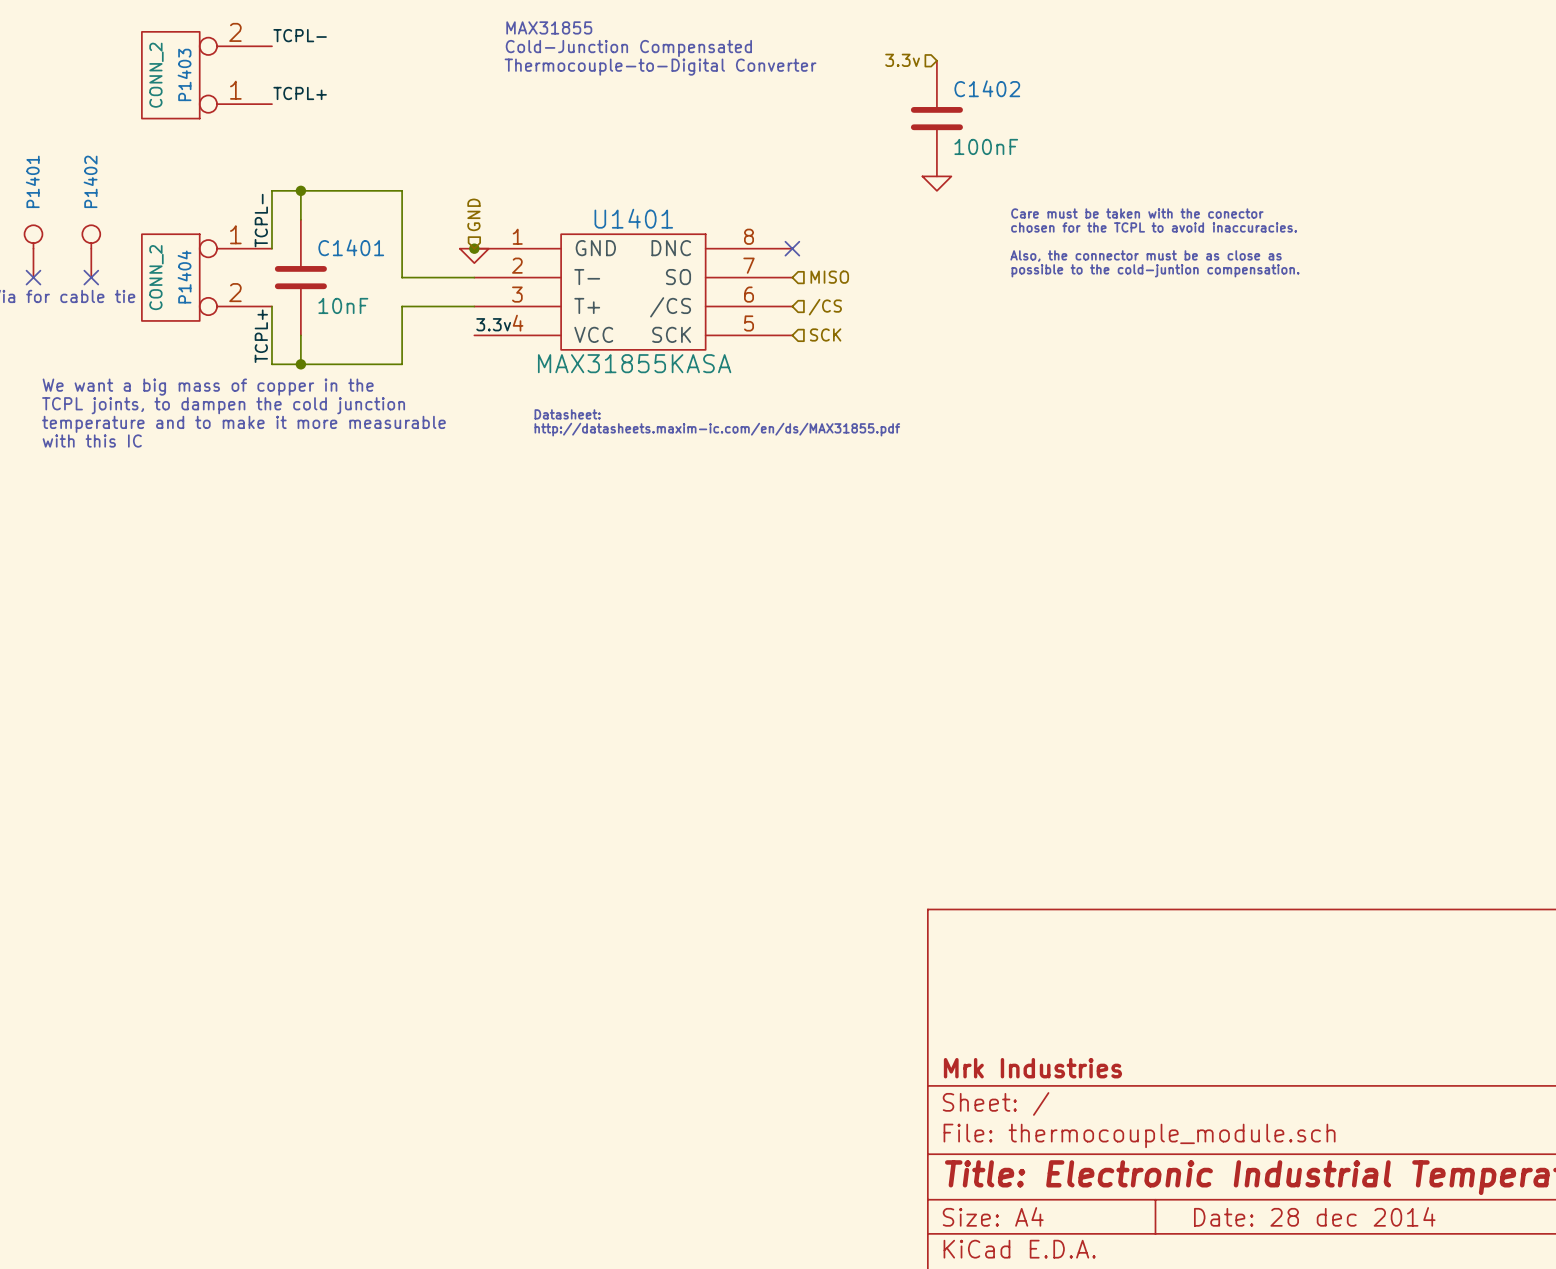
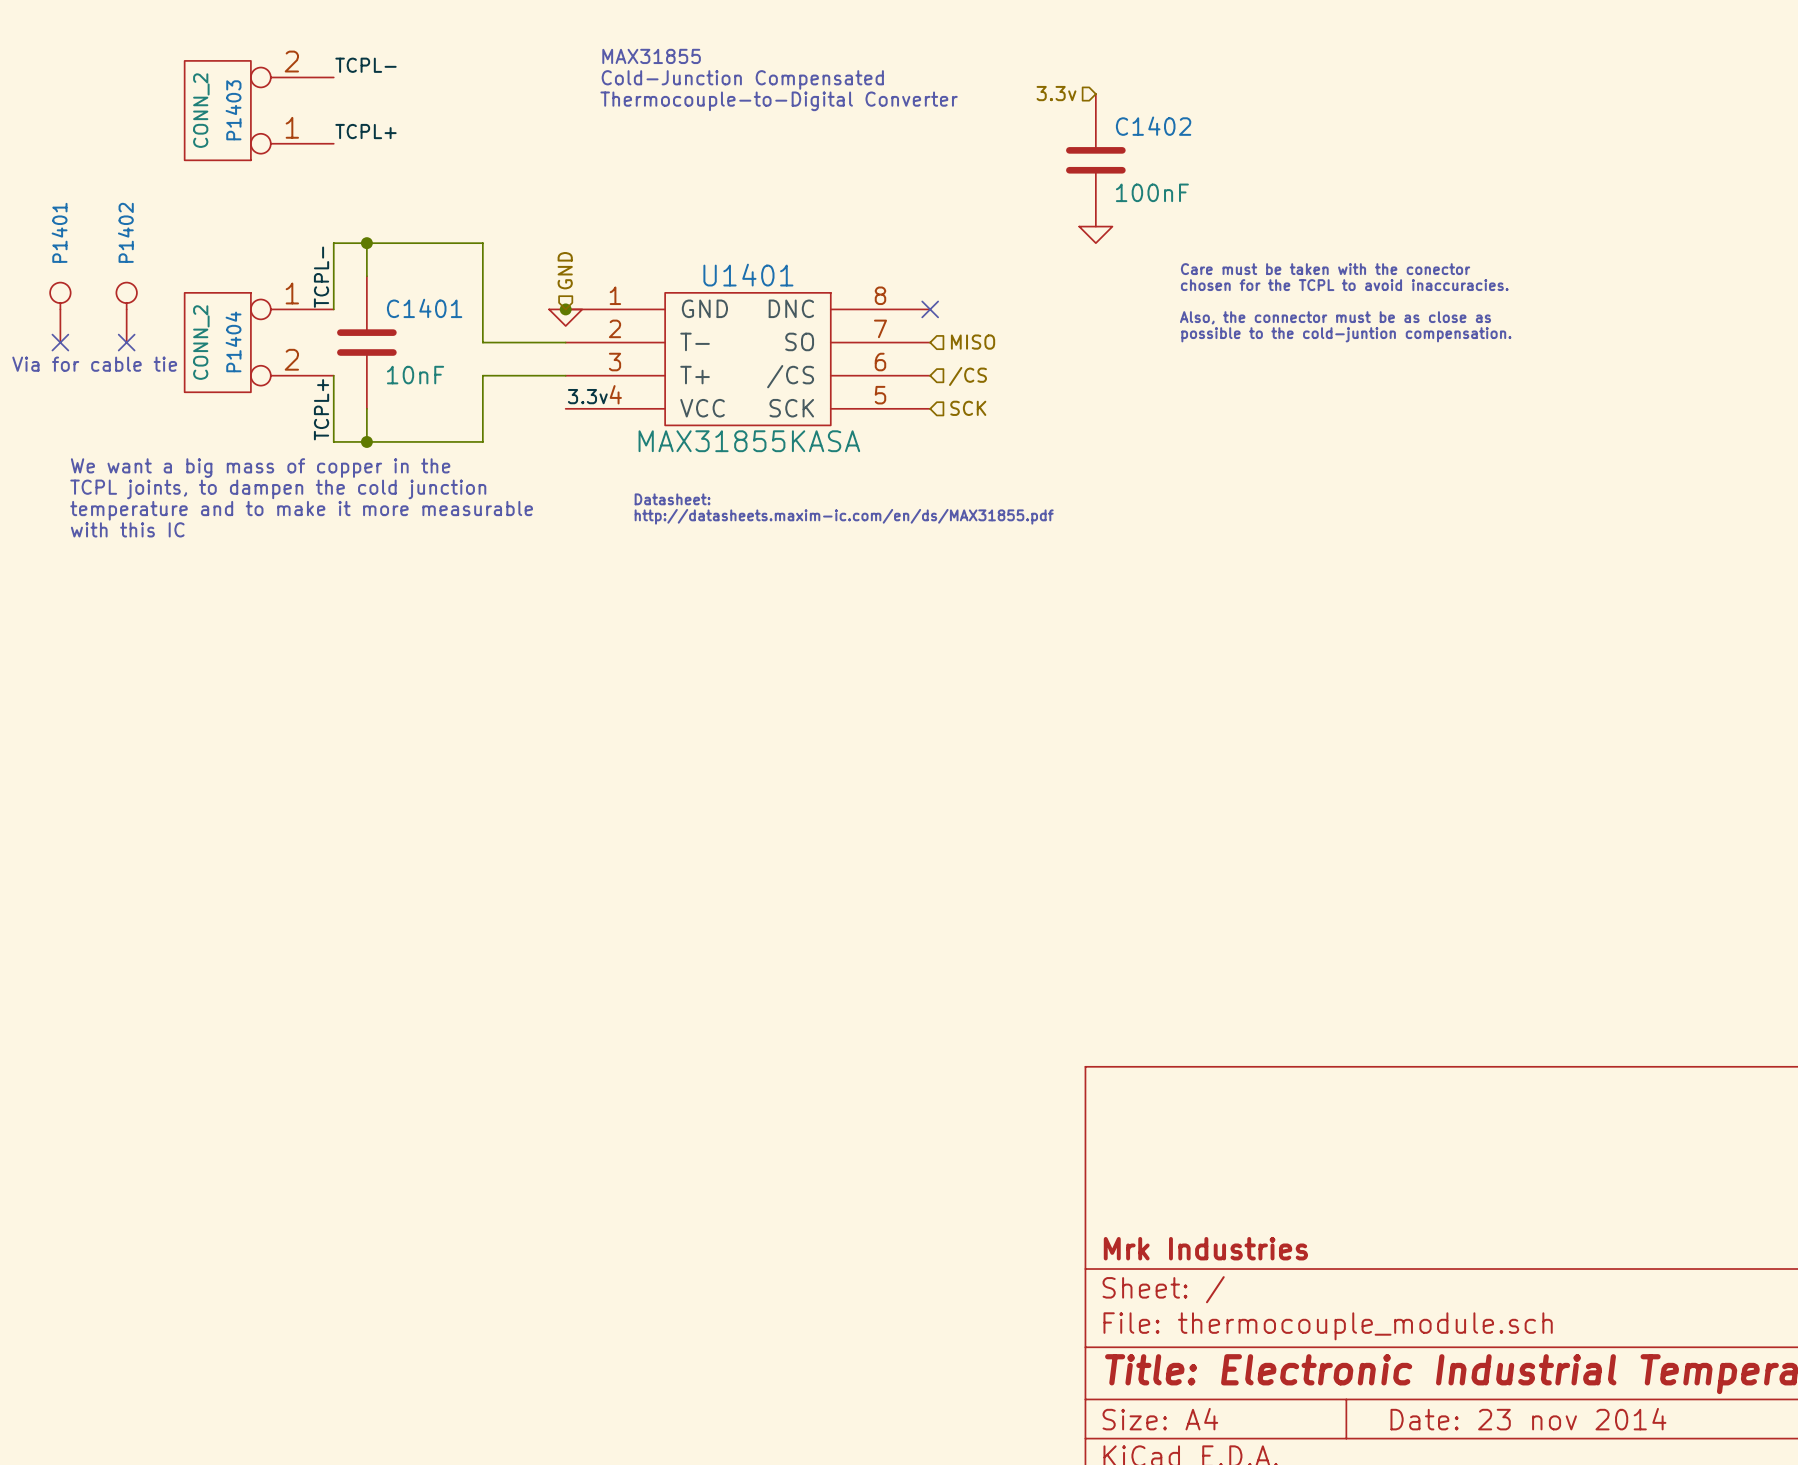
title block: Date: 28 dec 2014 (1314, 1216) -> Date: 23 nov 2014 (1528, 1419)

